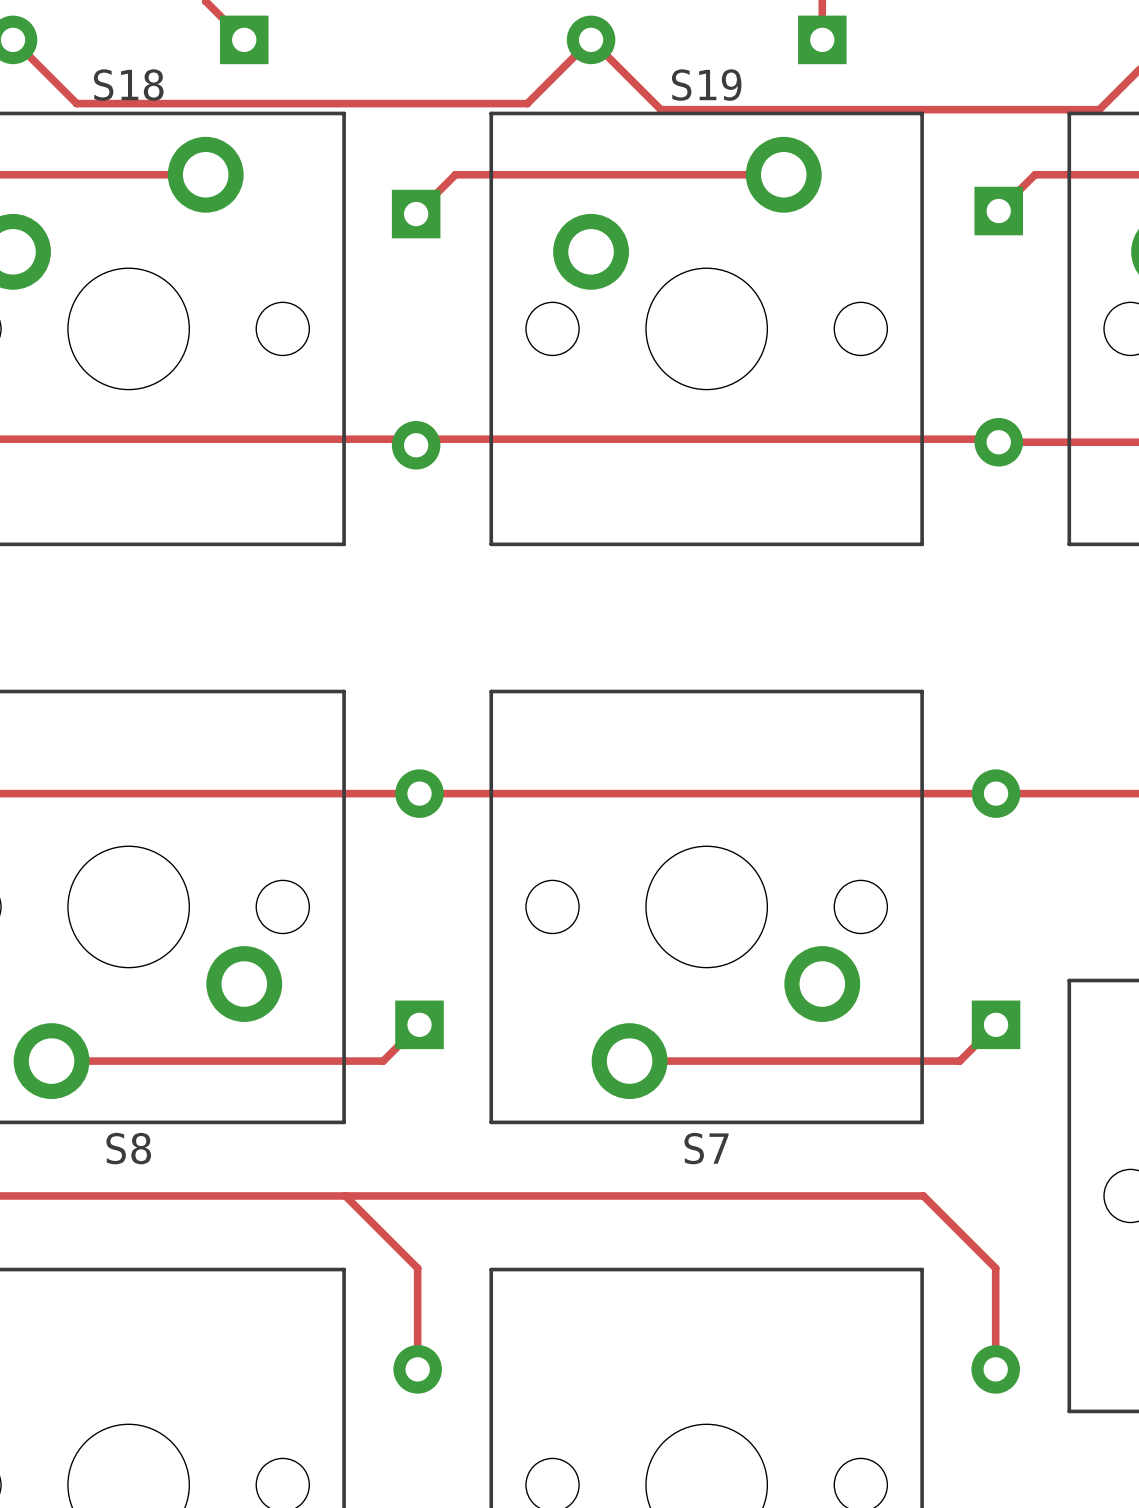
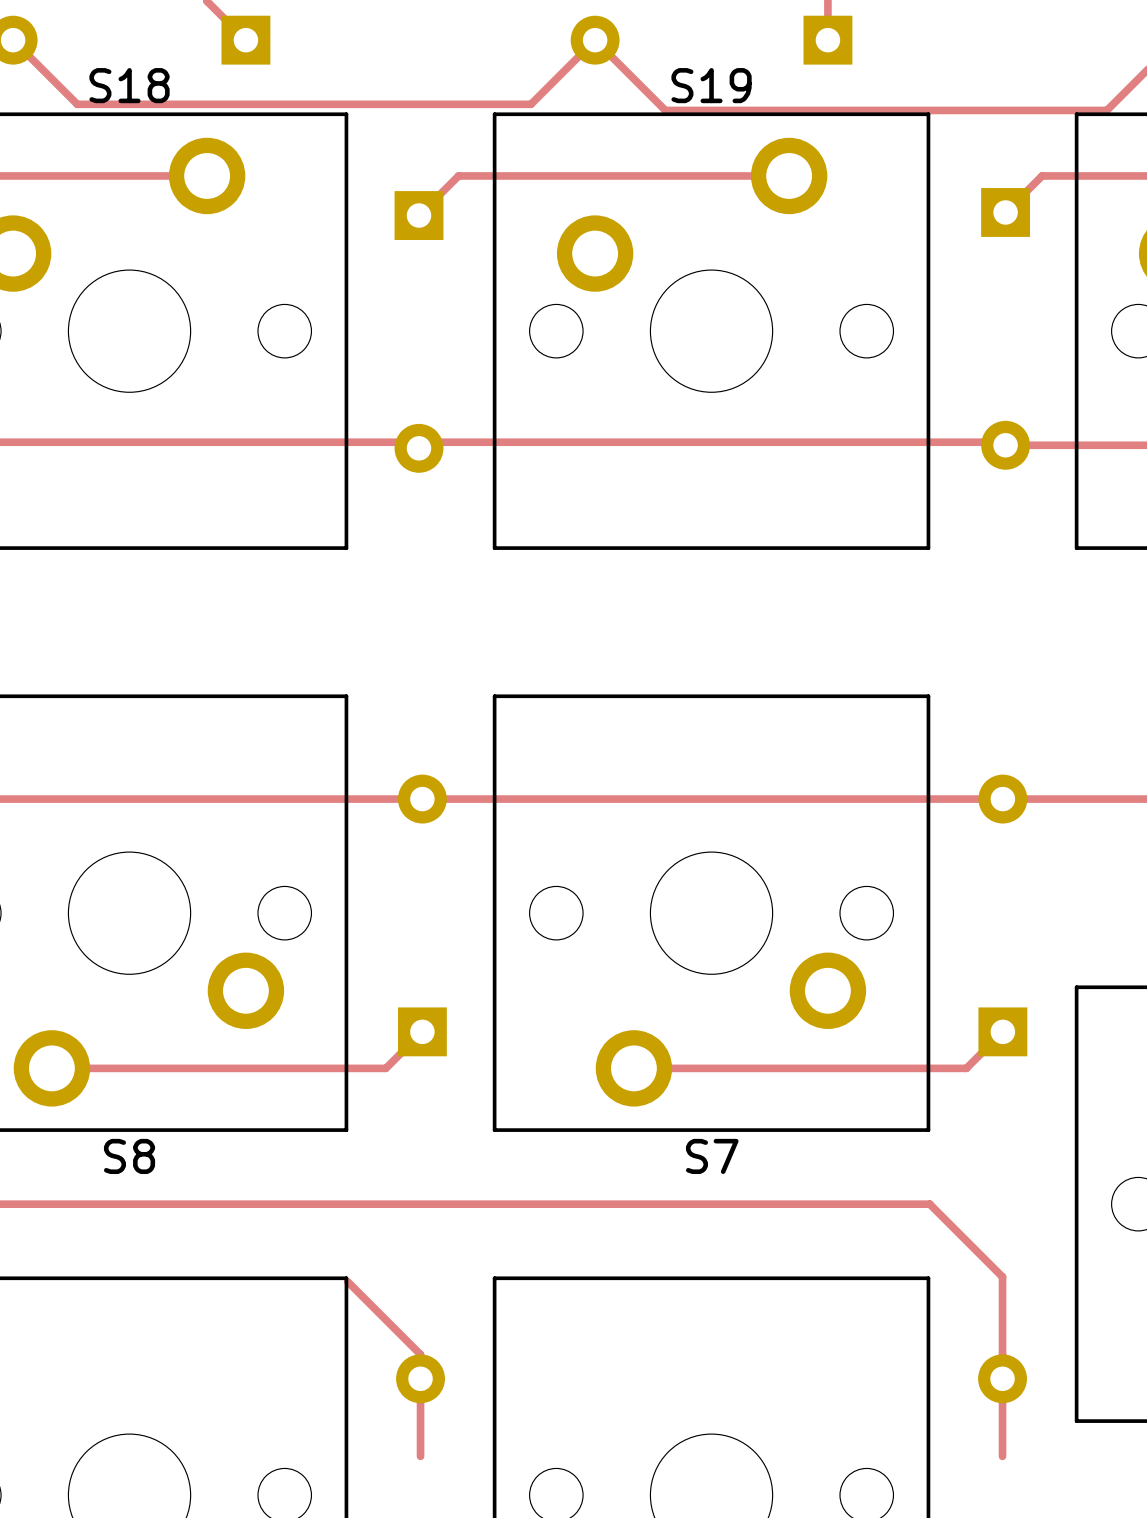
track: (345, 1195) (417, 1268) (417, 1345) -> (347, 1281) (420, 1354)
track: none -> (420, 1378) (420, 1456)
track: none -> (1002, 1378) (1002, 1456)

